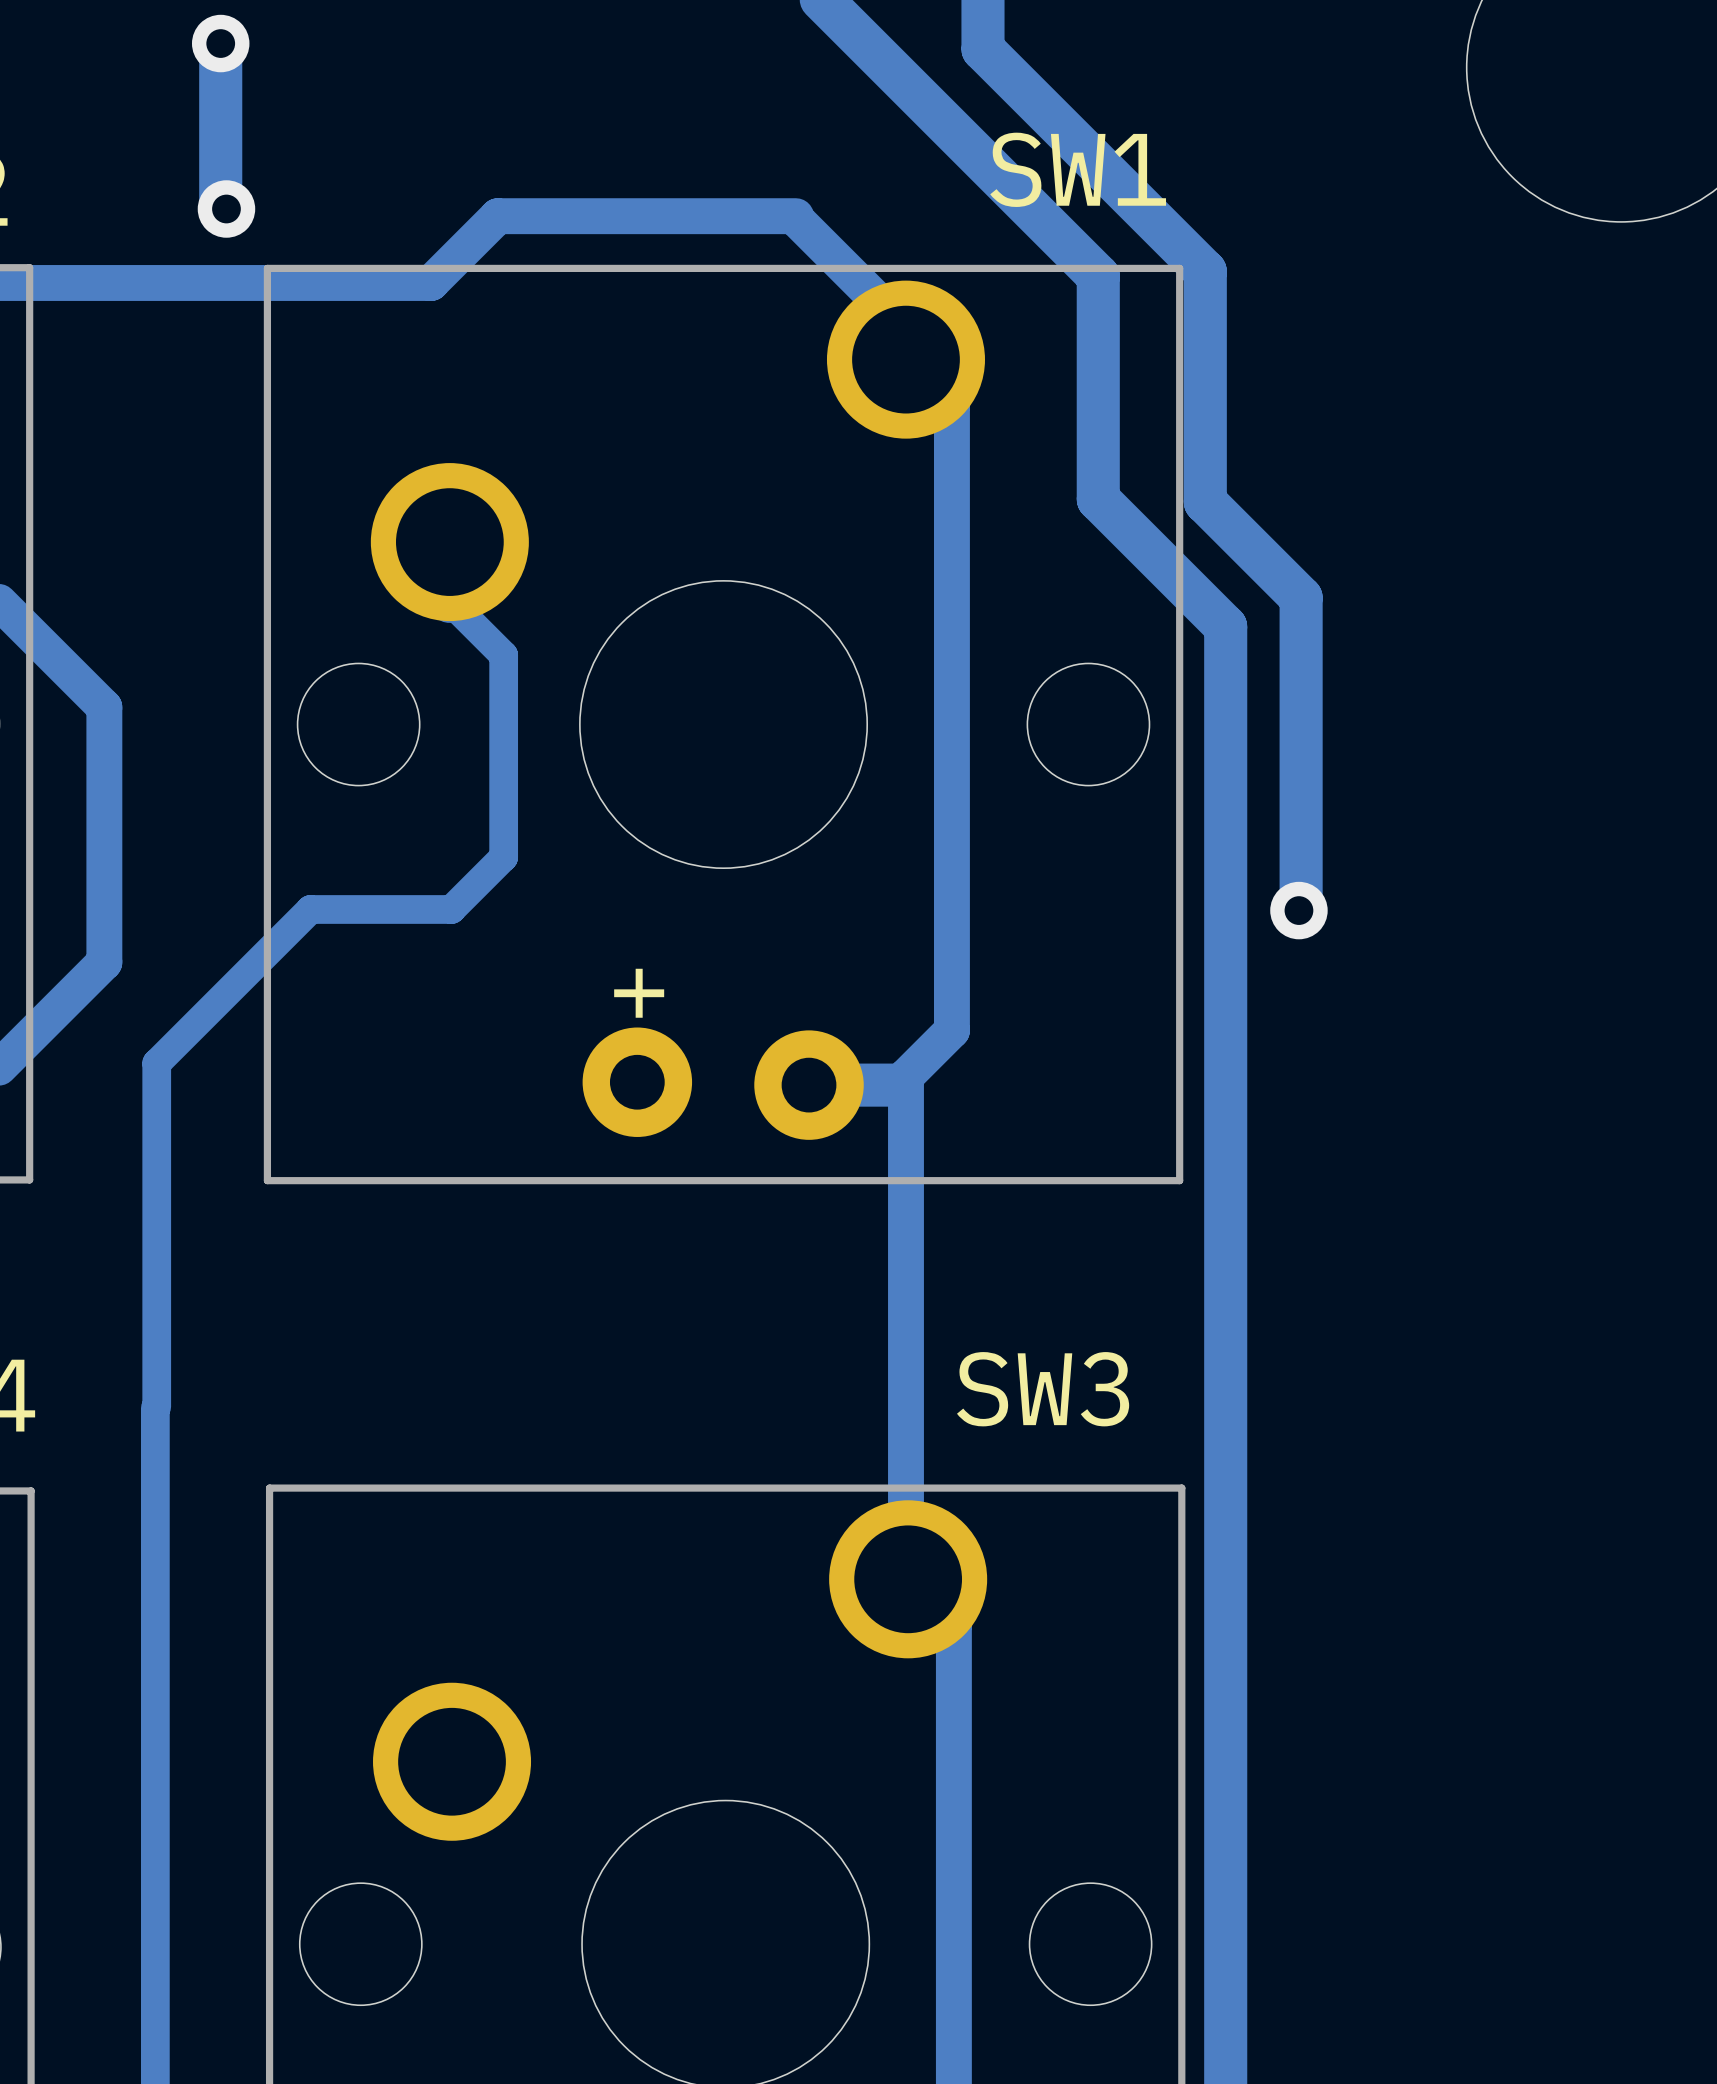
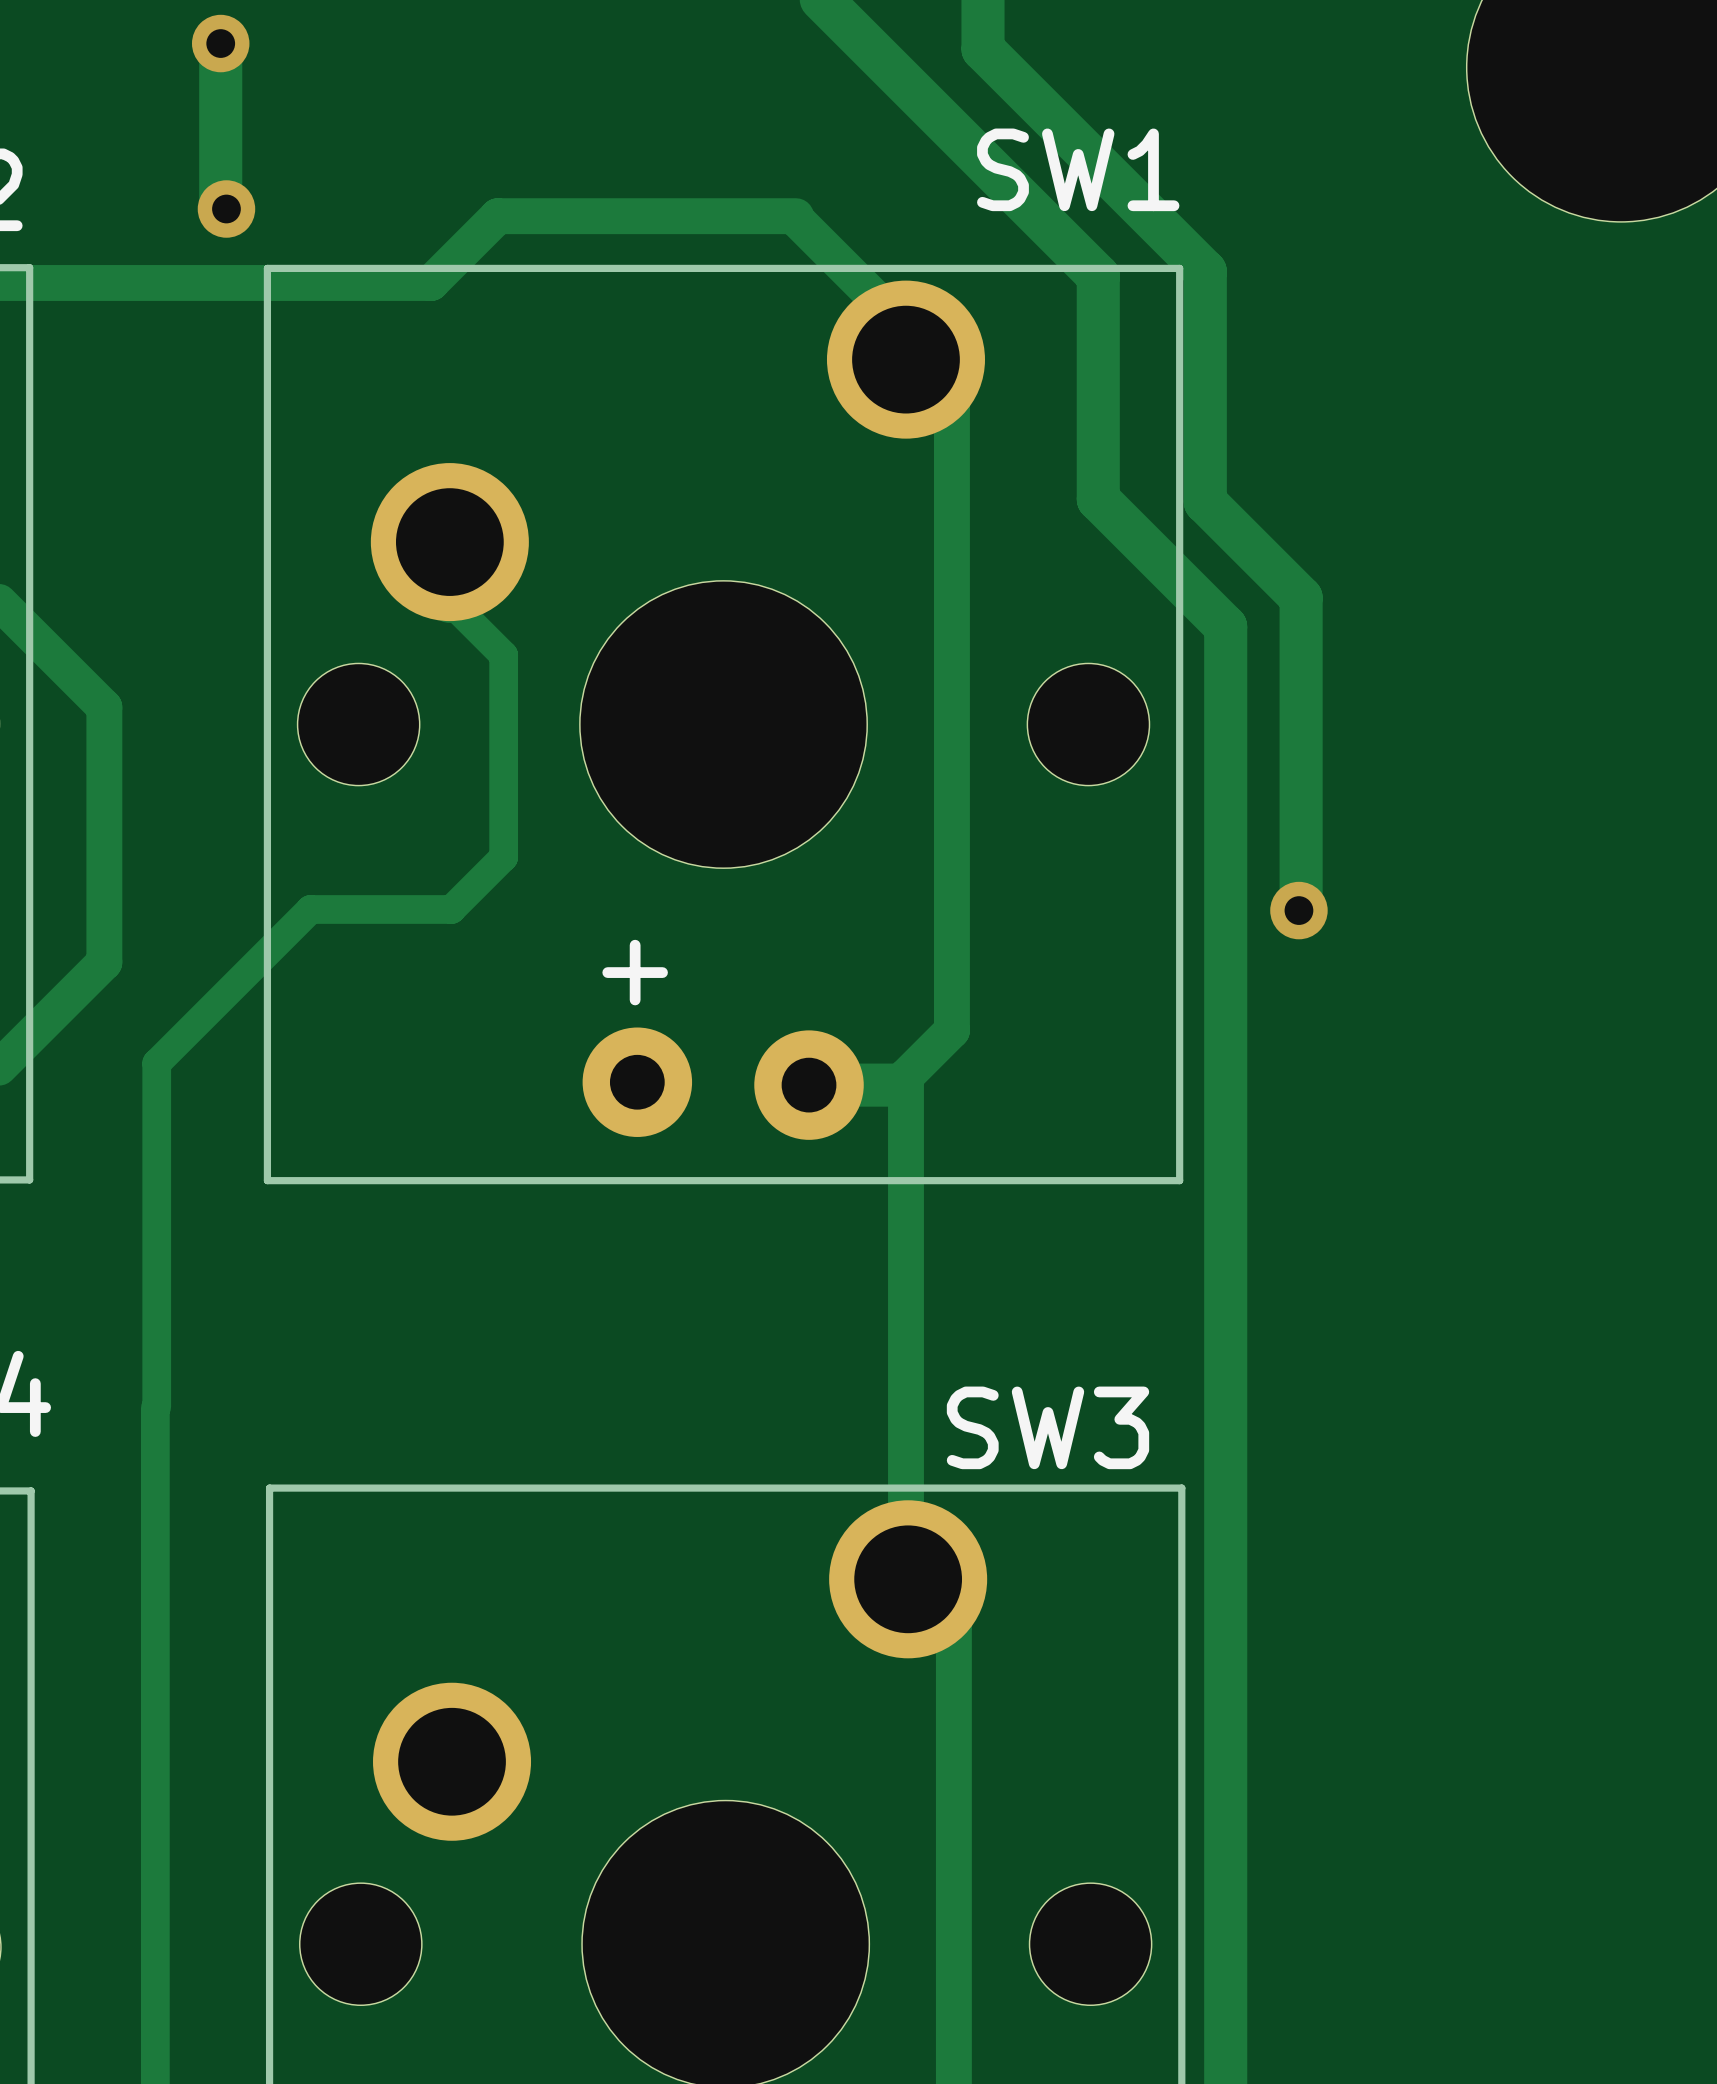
SW3 name position: SW3 (1043, 1389) -> SW3 (1047, 1427)

